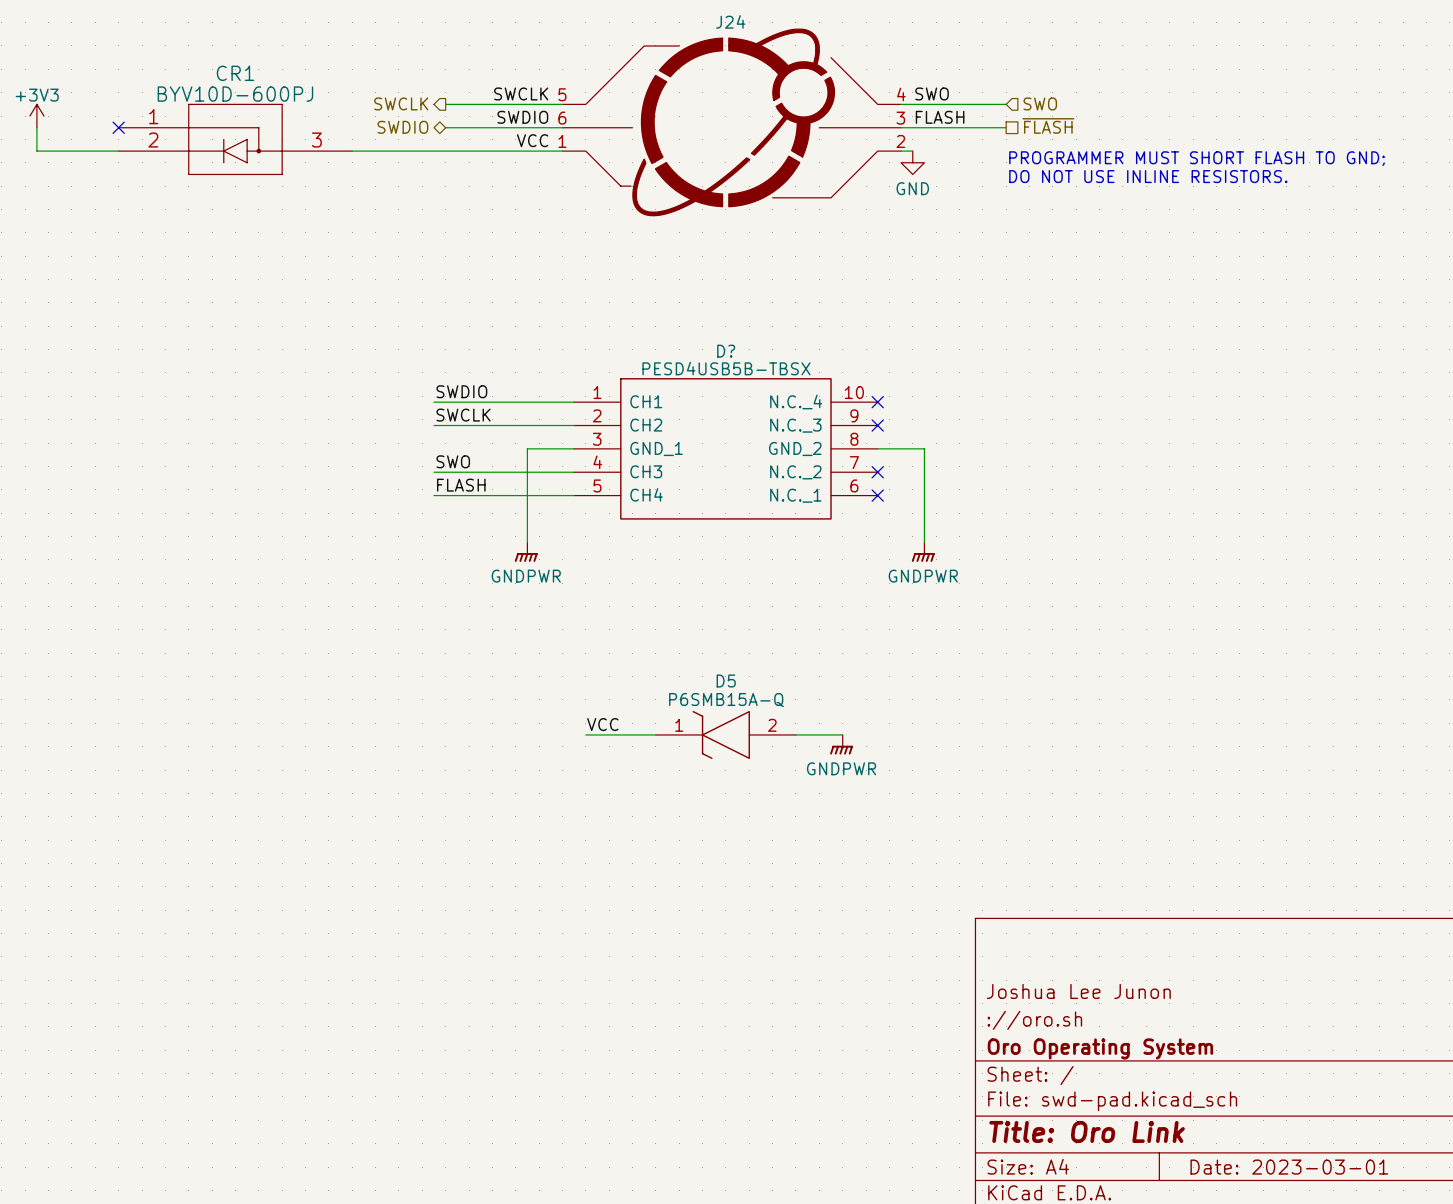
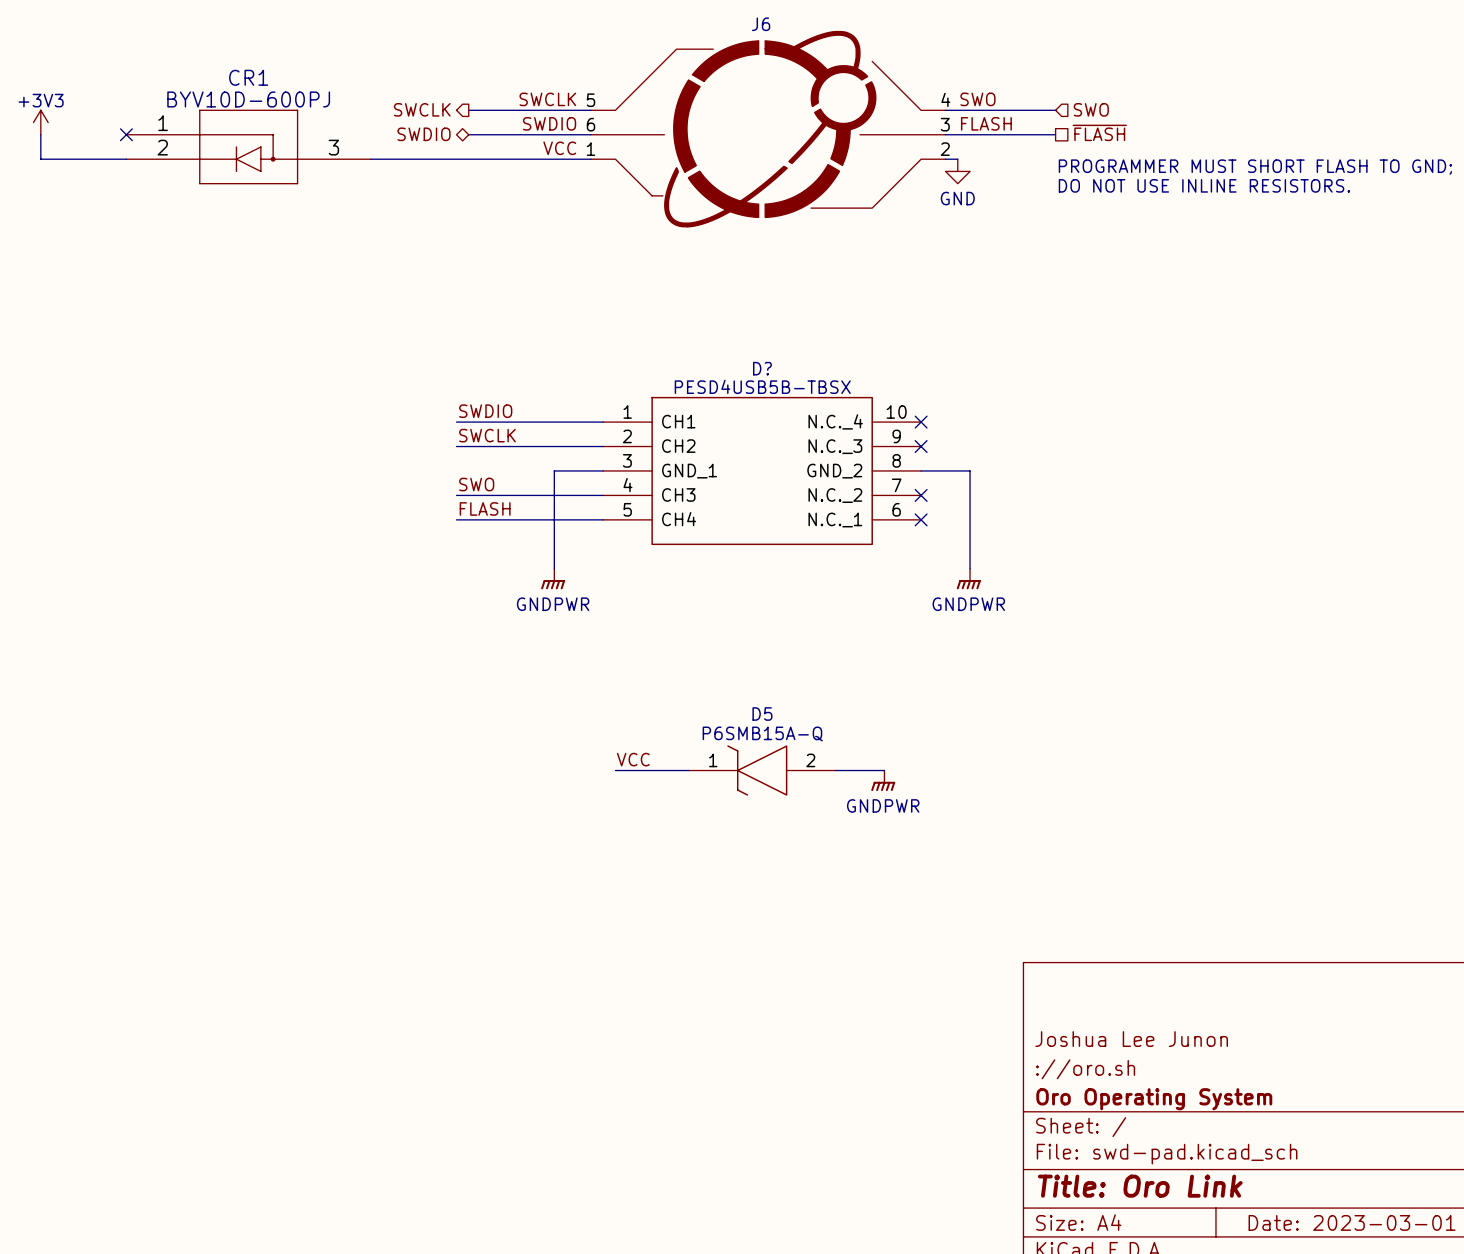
J24 name: J24 (730, 21) -> J6 (761, 24)

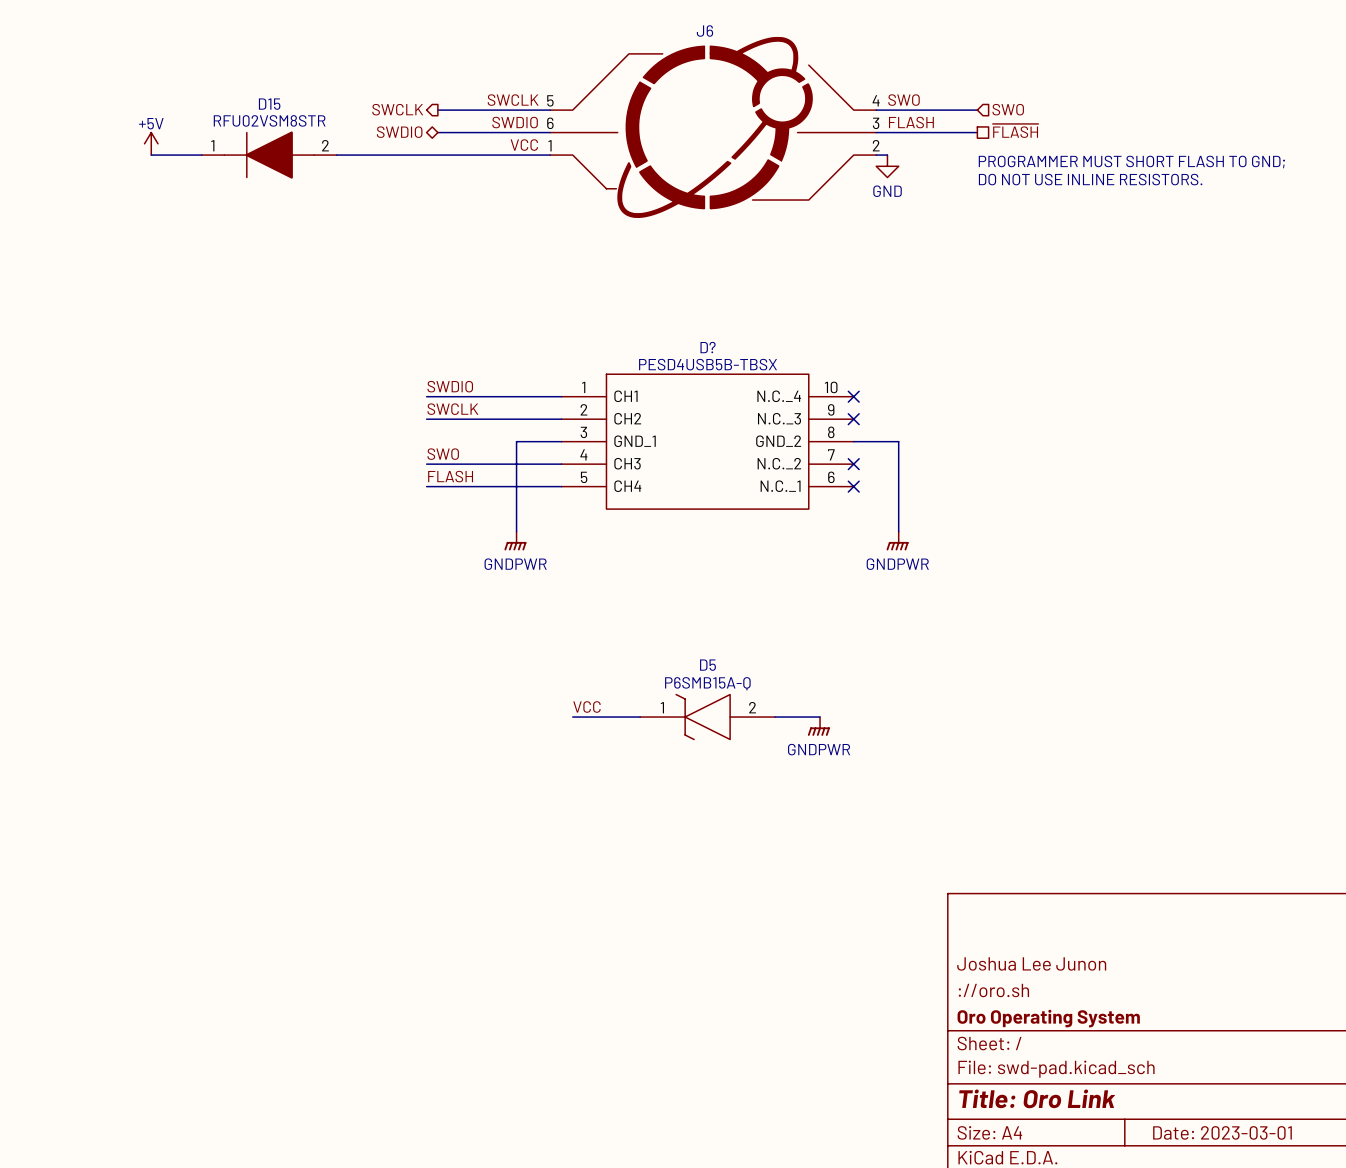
power symbol: +3V3 (40, 122) -> none
wire: (40, 134) (40, 159) (126, 159) -> none
no-connect mark: (126, 134) -> none
power symbol: none -> +5V (151, 143)
CR1: BYV10D-600PJ (248, 146) -> none
D15: none -> RFU02VSM8STR (269, 155)

